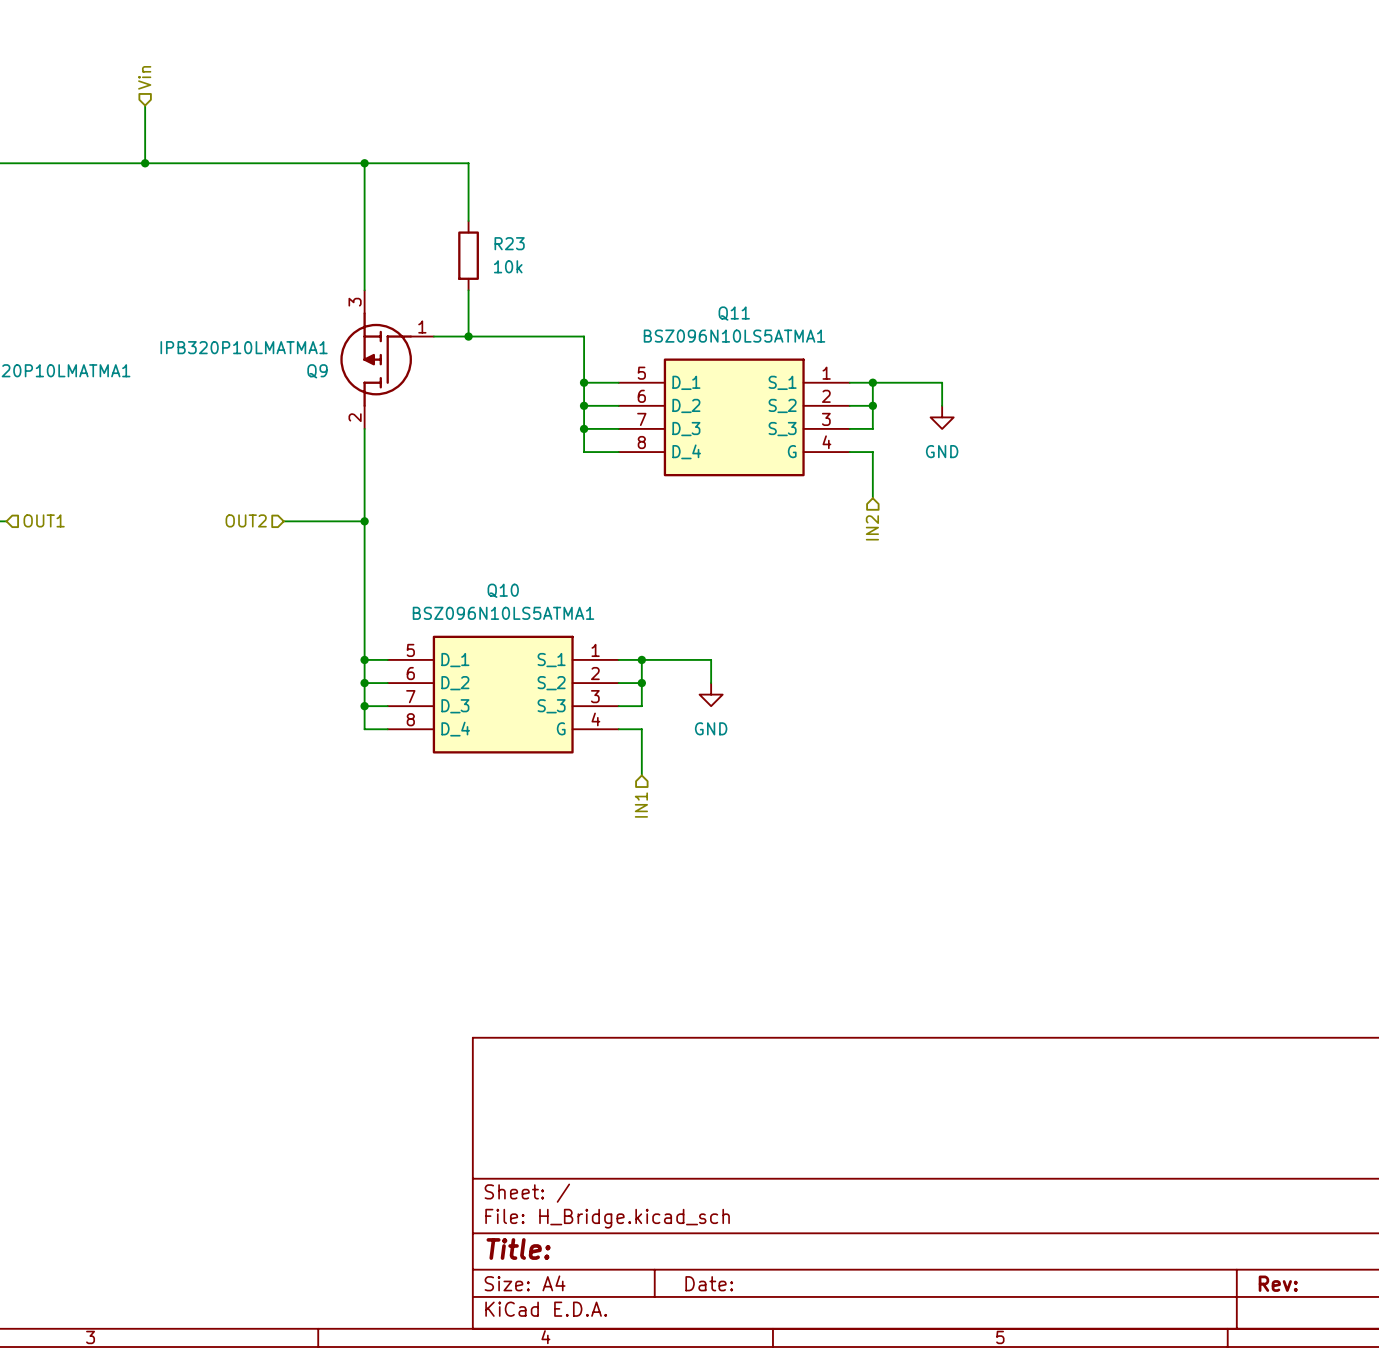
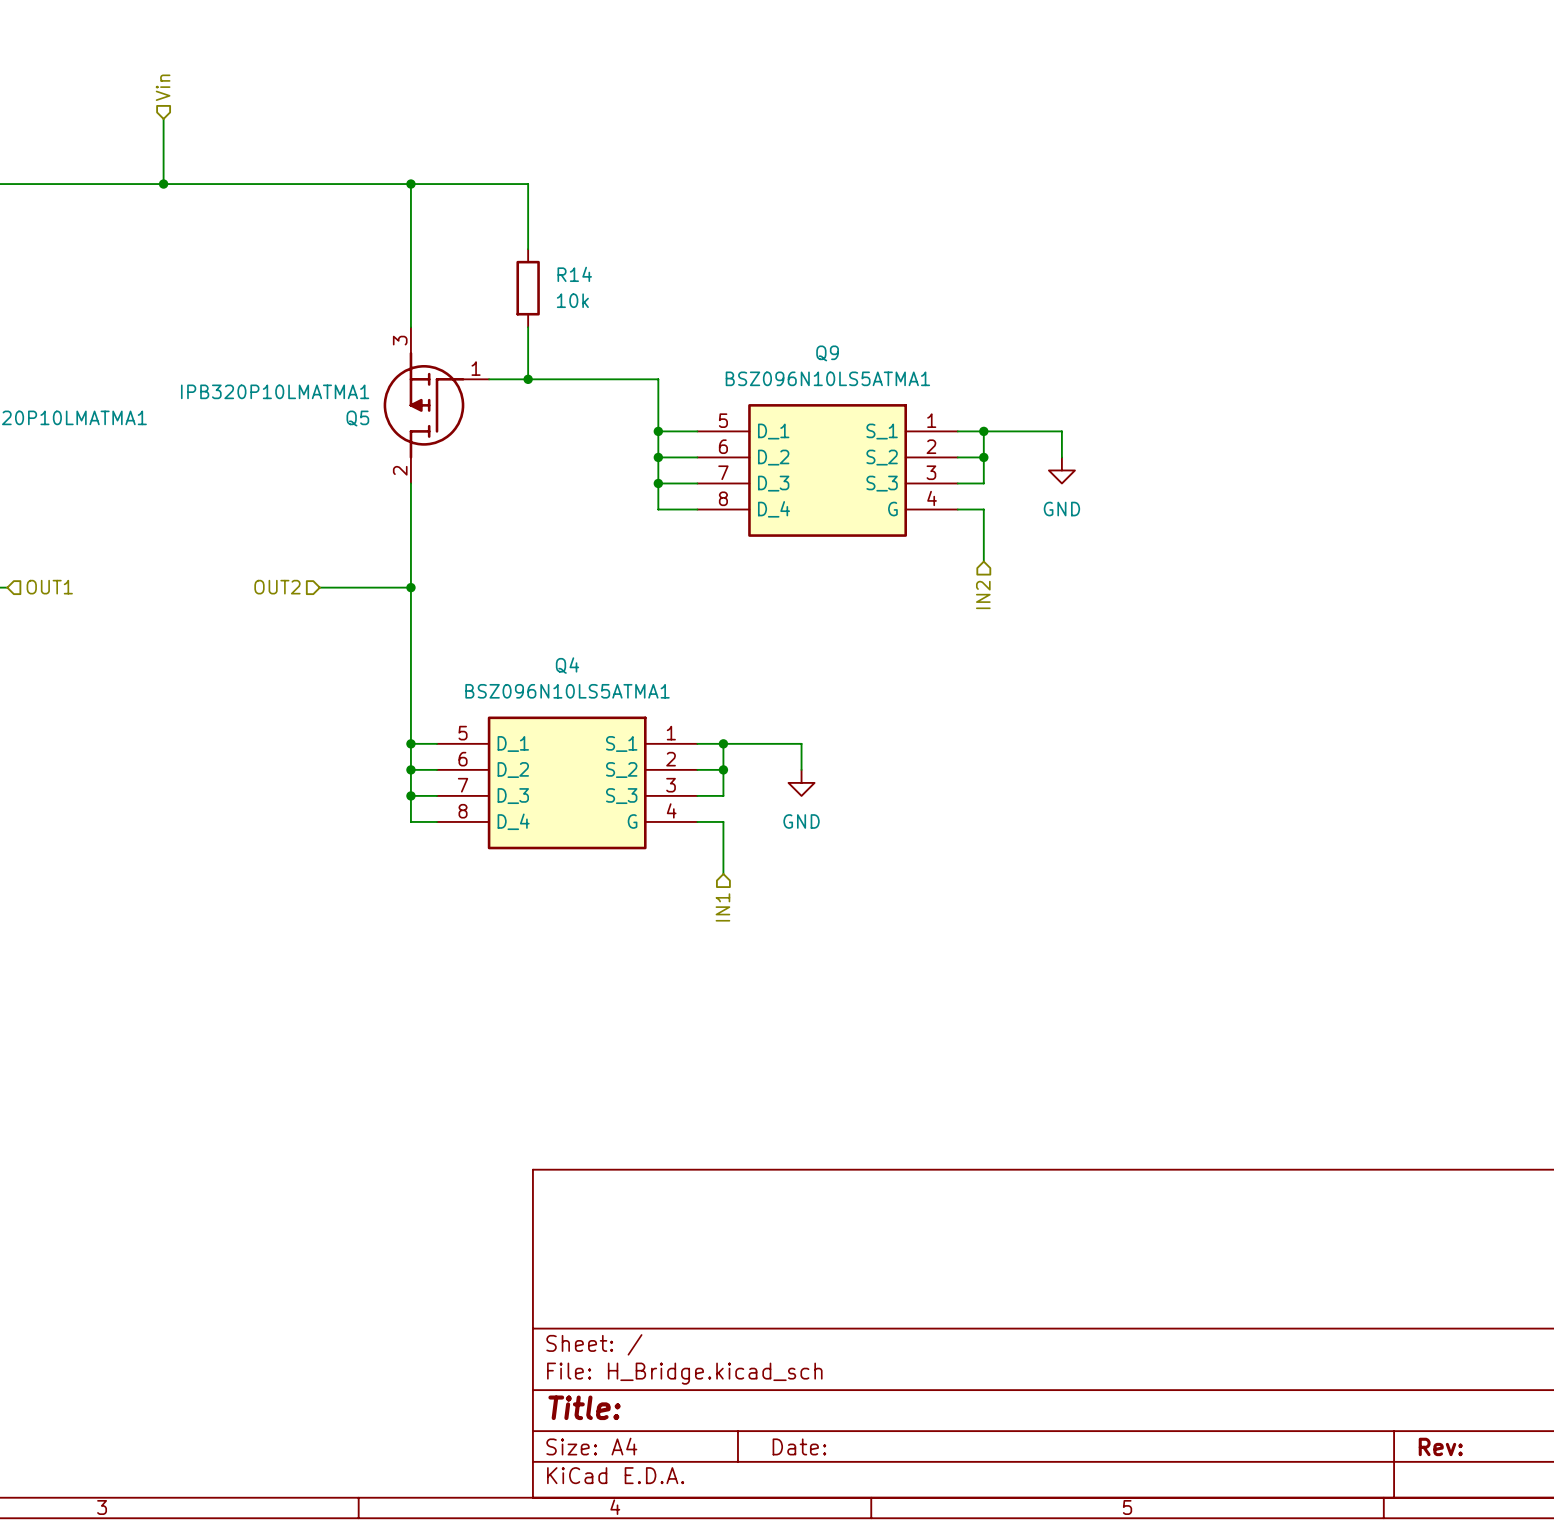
R23 name: R23 (509, 243) -> R14 (574, 274)
Q11 name: Q11 (734, 313) -> Q9 (827, 353)
Q9 name: Q9 (317, 371) -> Q5 (357, 418)
Q10 name: Q10 (503, 590) -> Q4 (567, 665)

